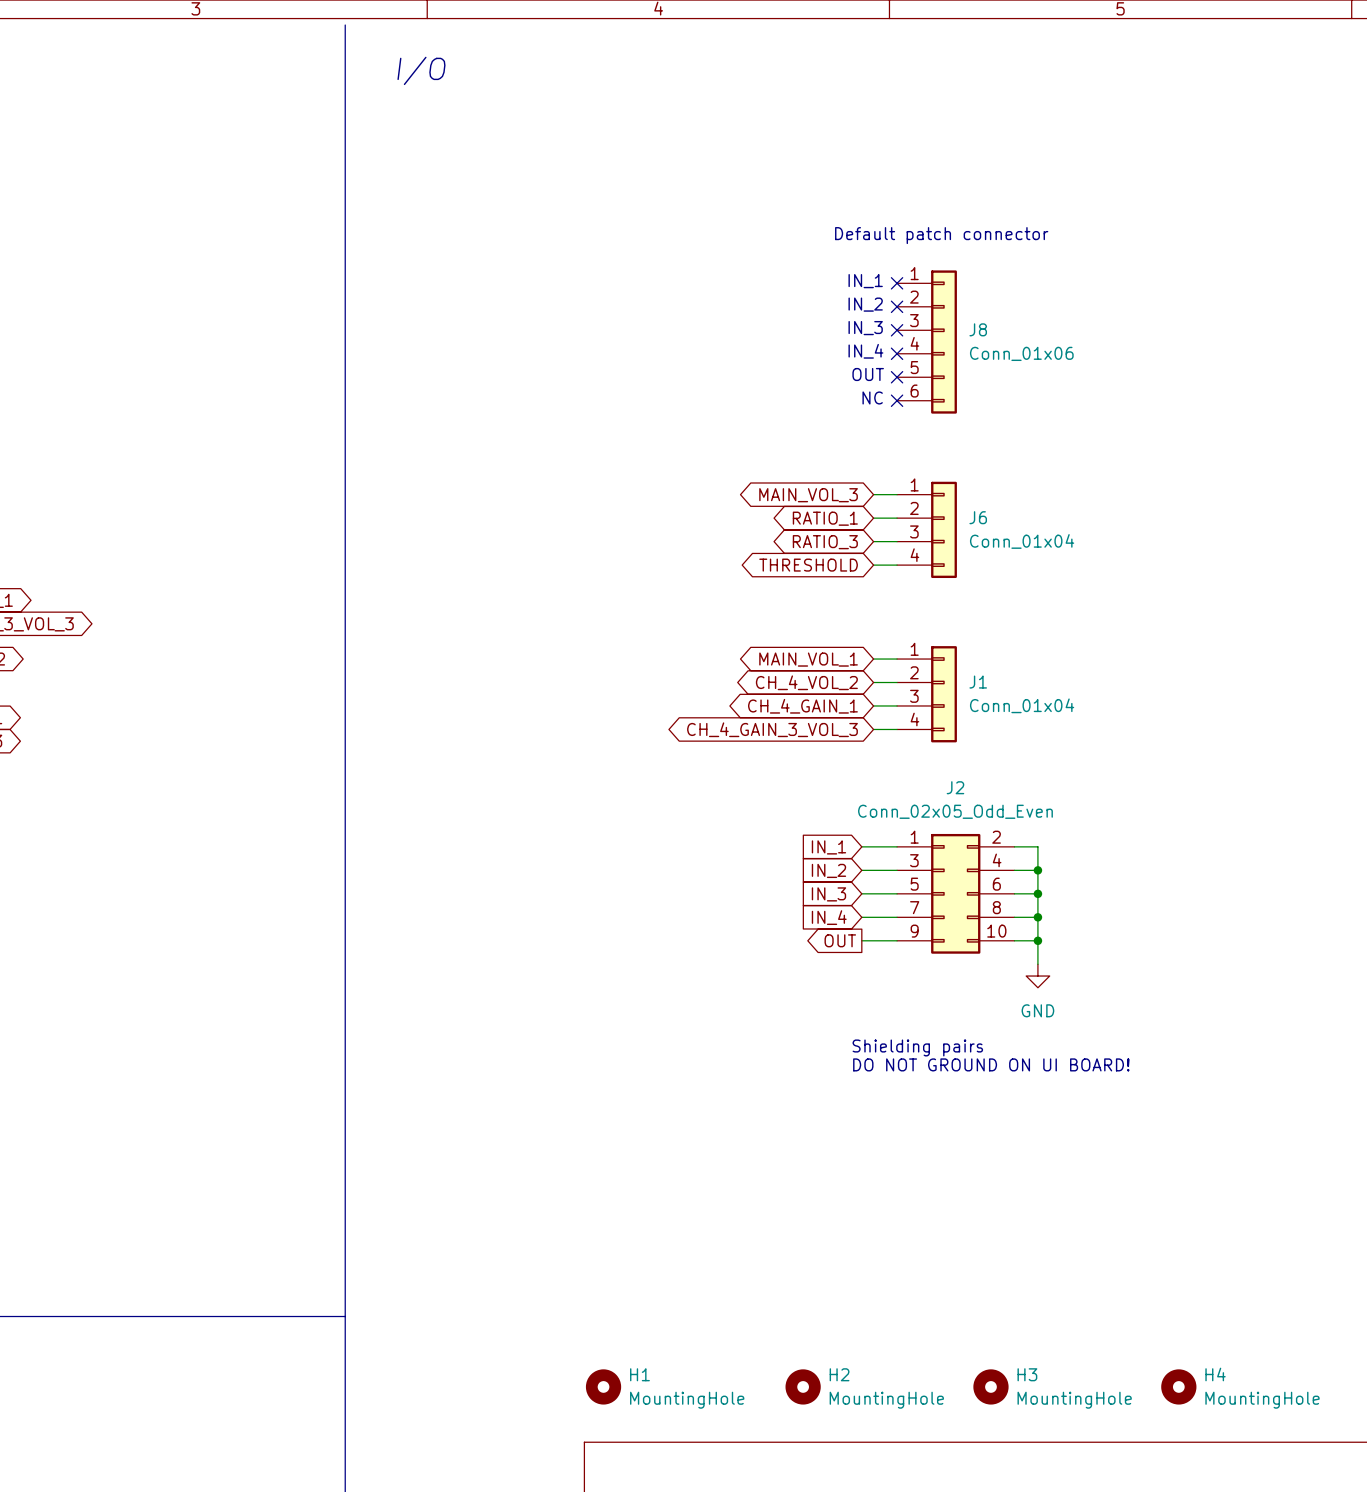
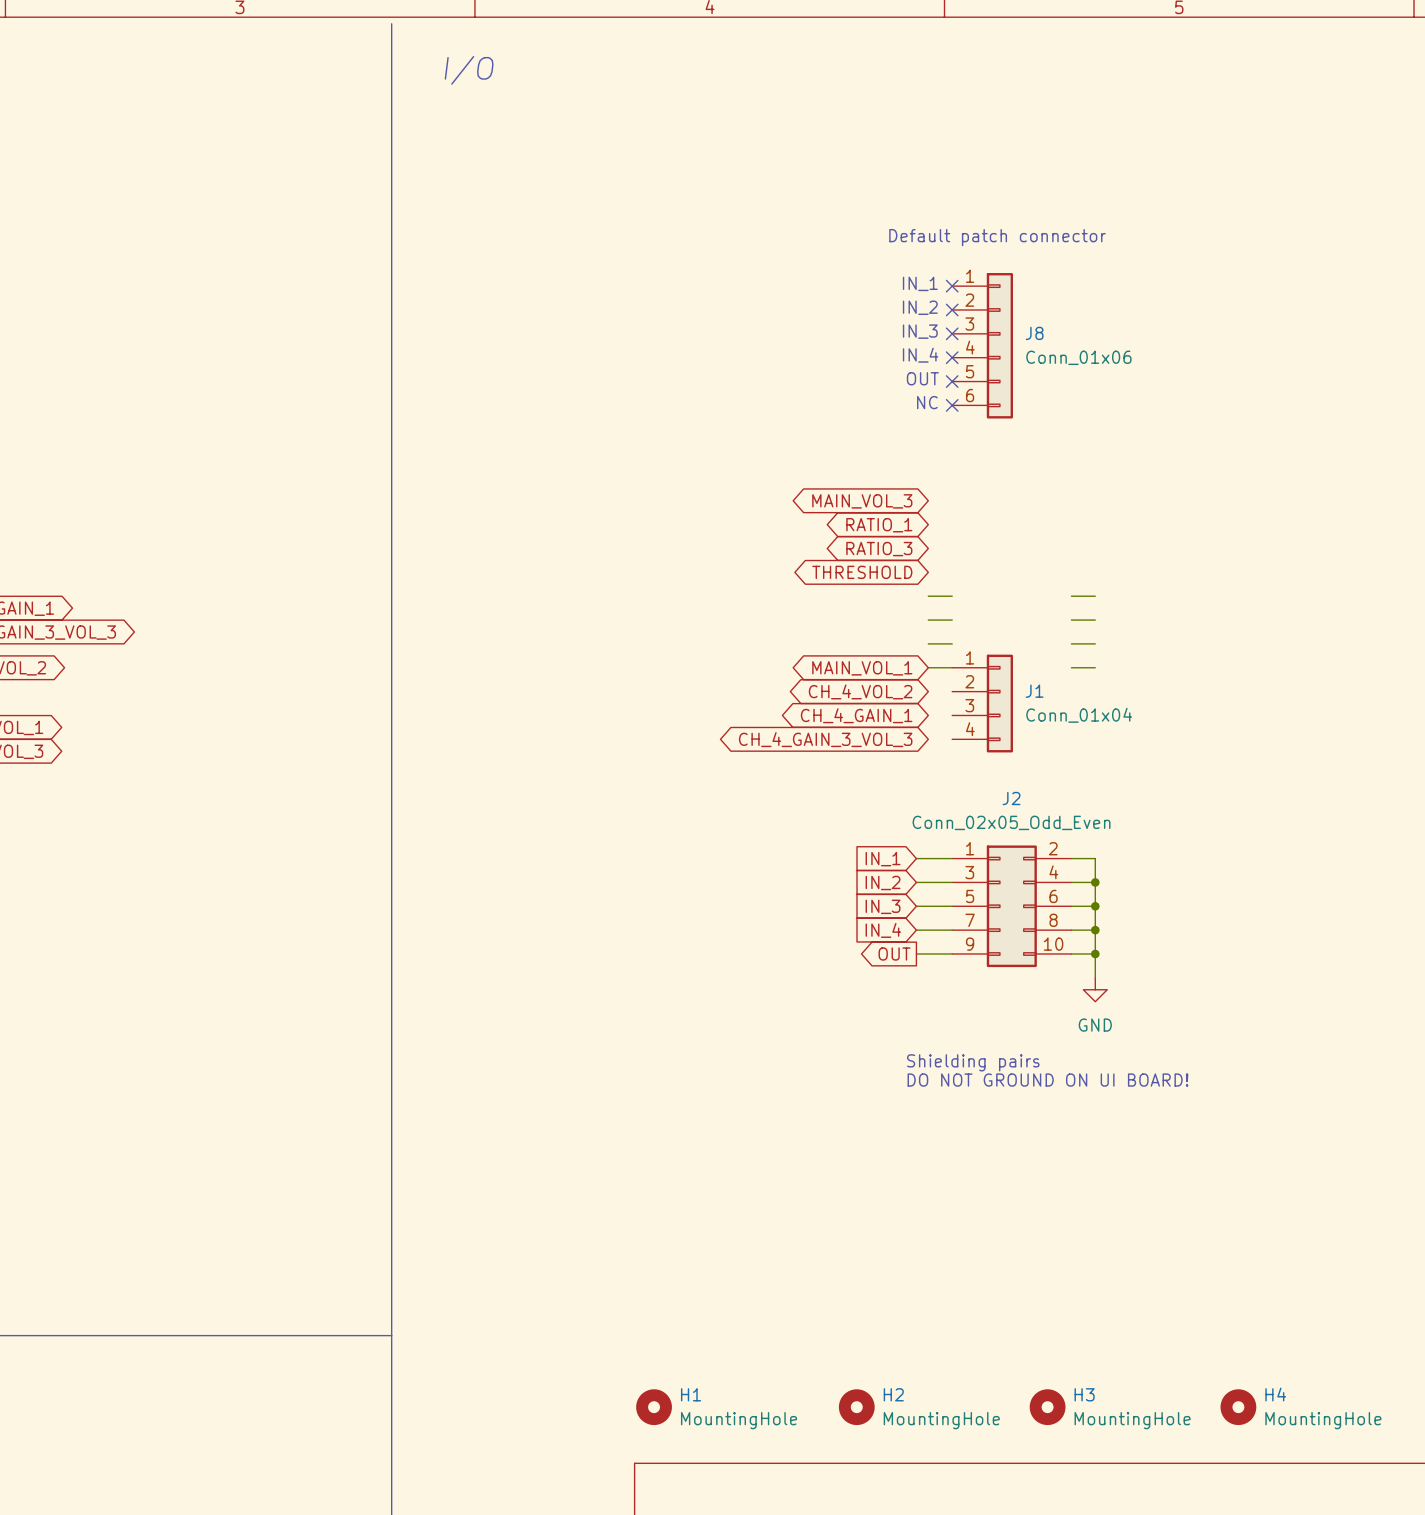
wire: (873, 494) (897, 494) -> (1071, 596) (1095, 596)
wire: (873, 518) (897, 518) -> (1071, 620) (1095, 620)
J6: Conn_01x04 (926, 529) -> none
wire: (873, 541) (897, 541) -> (1071, 643) (1095, 643)
wire: (873, 565) (897, 565) -> (1071, 667) (1095, 667)
wire: (873, 682) (897, 682) -> (928, 596) (952, 596)
wire: (873, 705) (897, 705) -> (928, 620) (952, 620)
wire: (873, 729) (897, 729) -> (928, 643) (952, 643)

